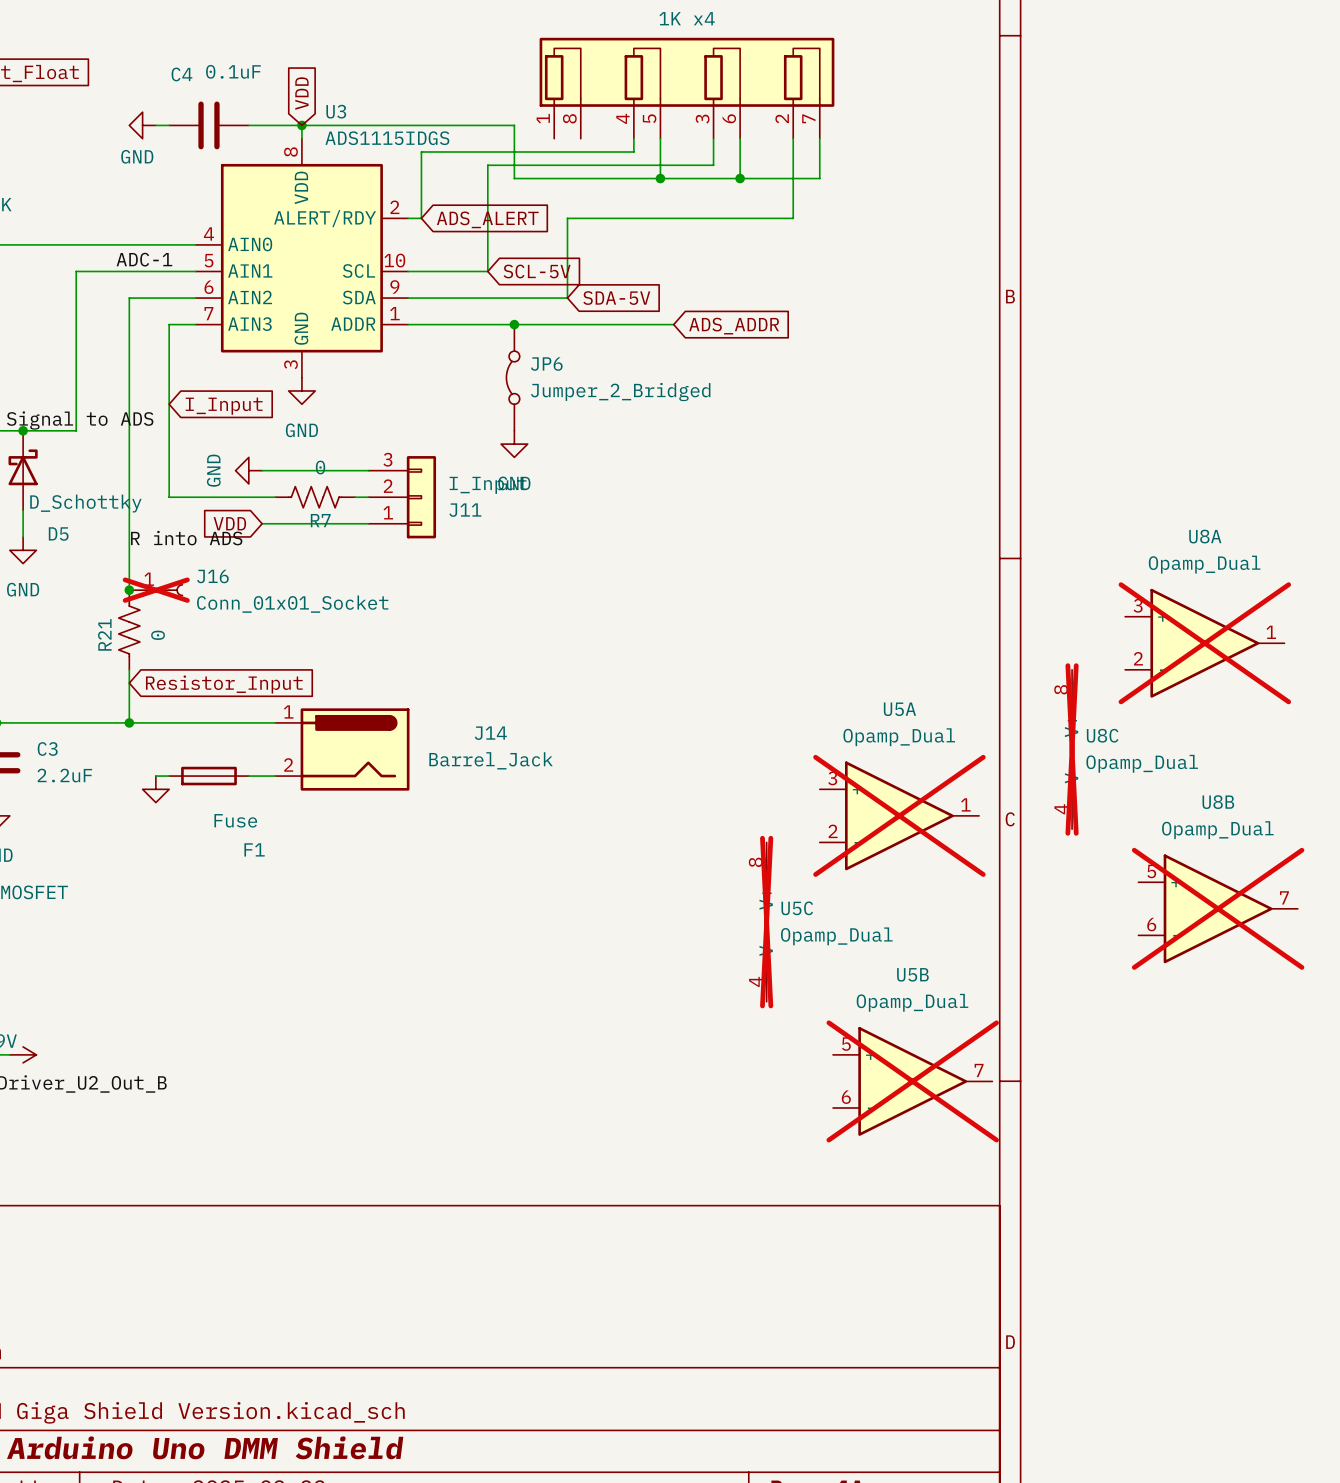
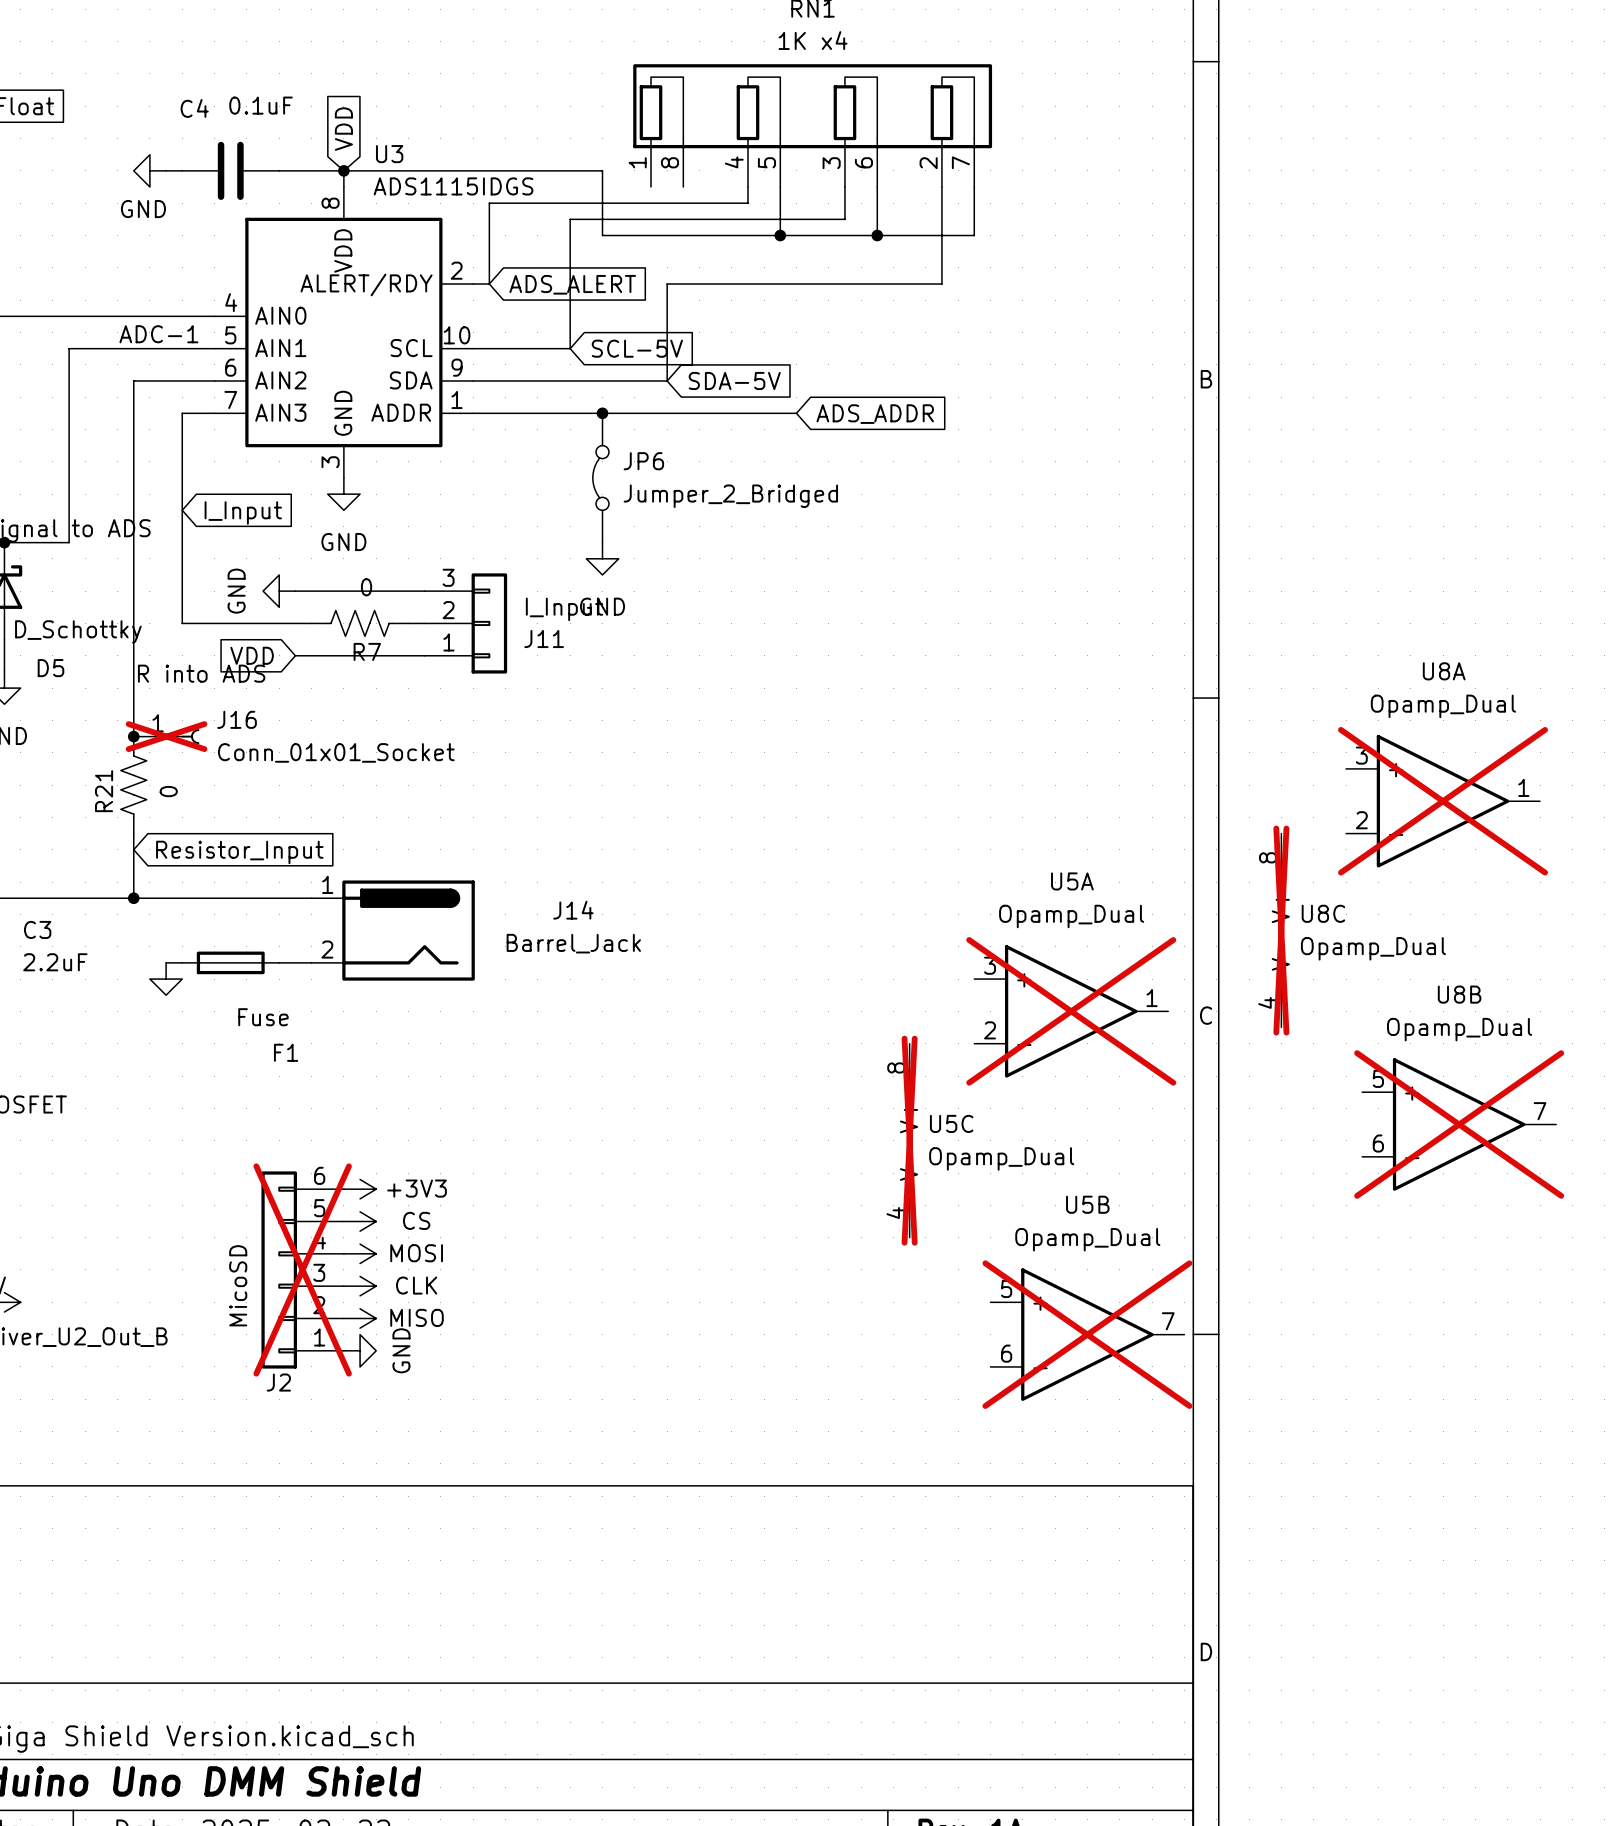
power symbol: none -> +3V3 (360, 1189)
power symbol: none -> CS (360, 1221)
power symbol: none -> MOSI (360, 1253)
J2: none -> MicoSD (302, 1269)
power symbol: none -> CLK (360, 1286)
power symbol: none -> MISO (360, 1318)
power symbol: none -> GND (360, 1350)

